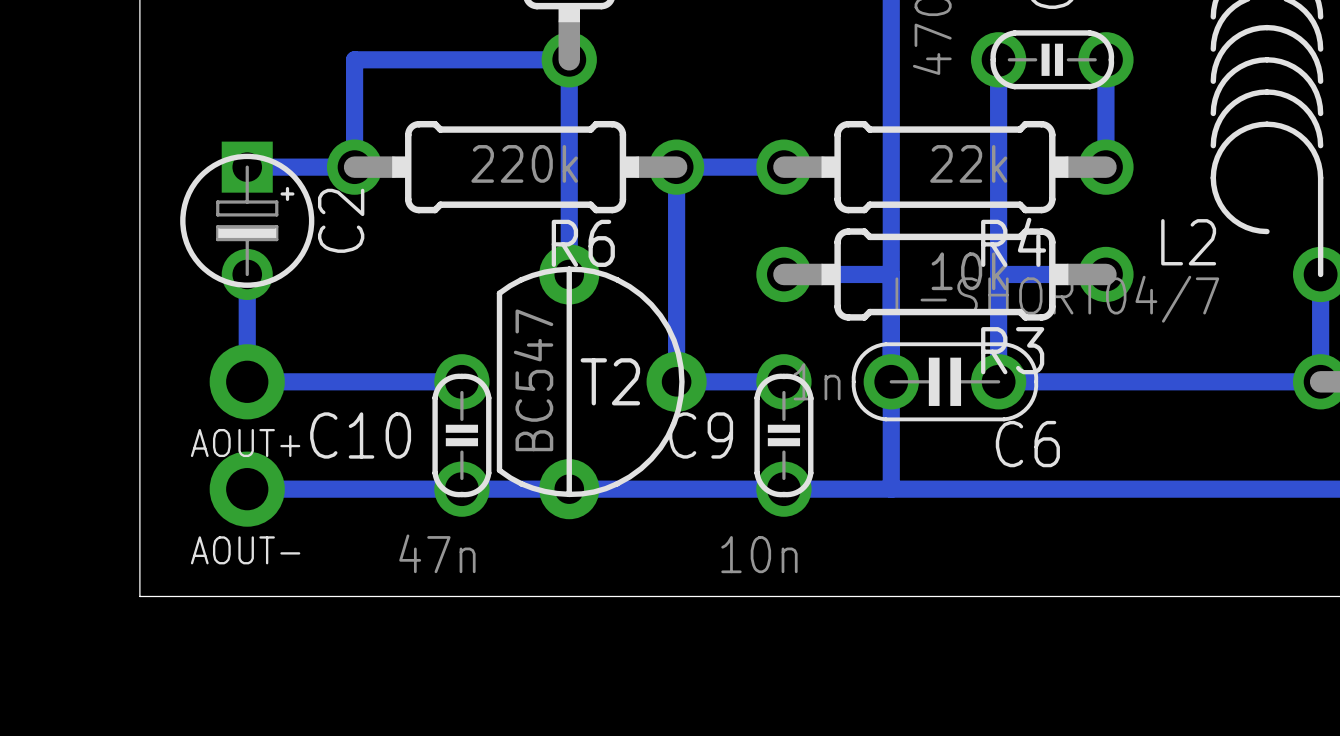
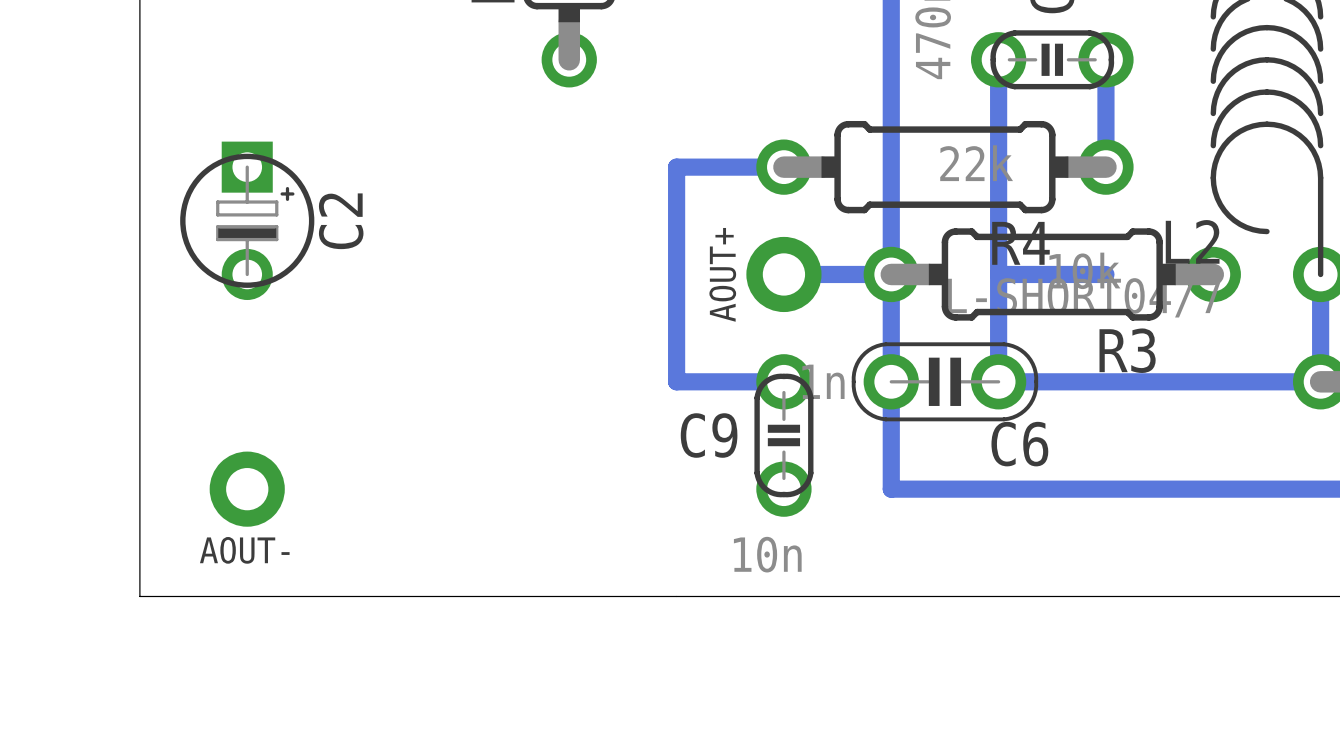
bottom track: (247, 167) (354, 167) (354, 59) (569, 59) (569, 274) -> none
R6: 220k (515, 167) -> none
bottom track: (247, 274) (247, 381) (461, 381) -> none
R3 position: (944, 274) -> (1052, 274)
AOUT+ position: (247, 381) -> (783, 274)
T2: BC547 (601, 381) -> none
C10: 47n (461, 435) -> none
AOUT+ name rotation: 0° (245, 442) -> 90° counterclockwise (722, 274)
bottom track: (247, 489) (891, 489) -> none

